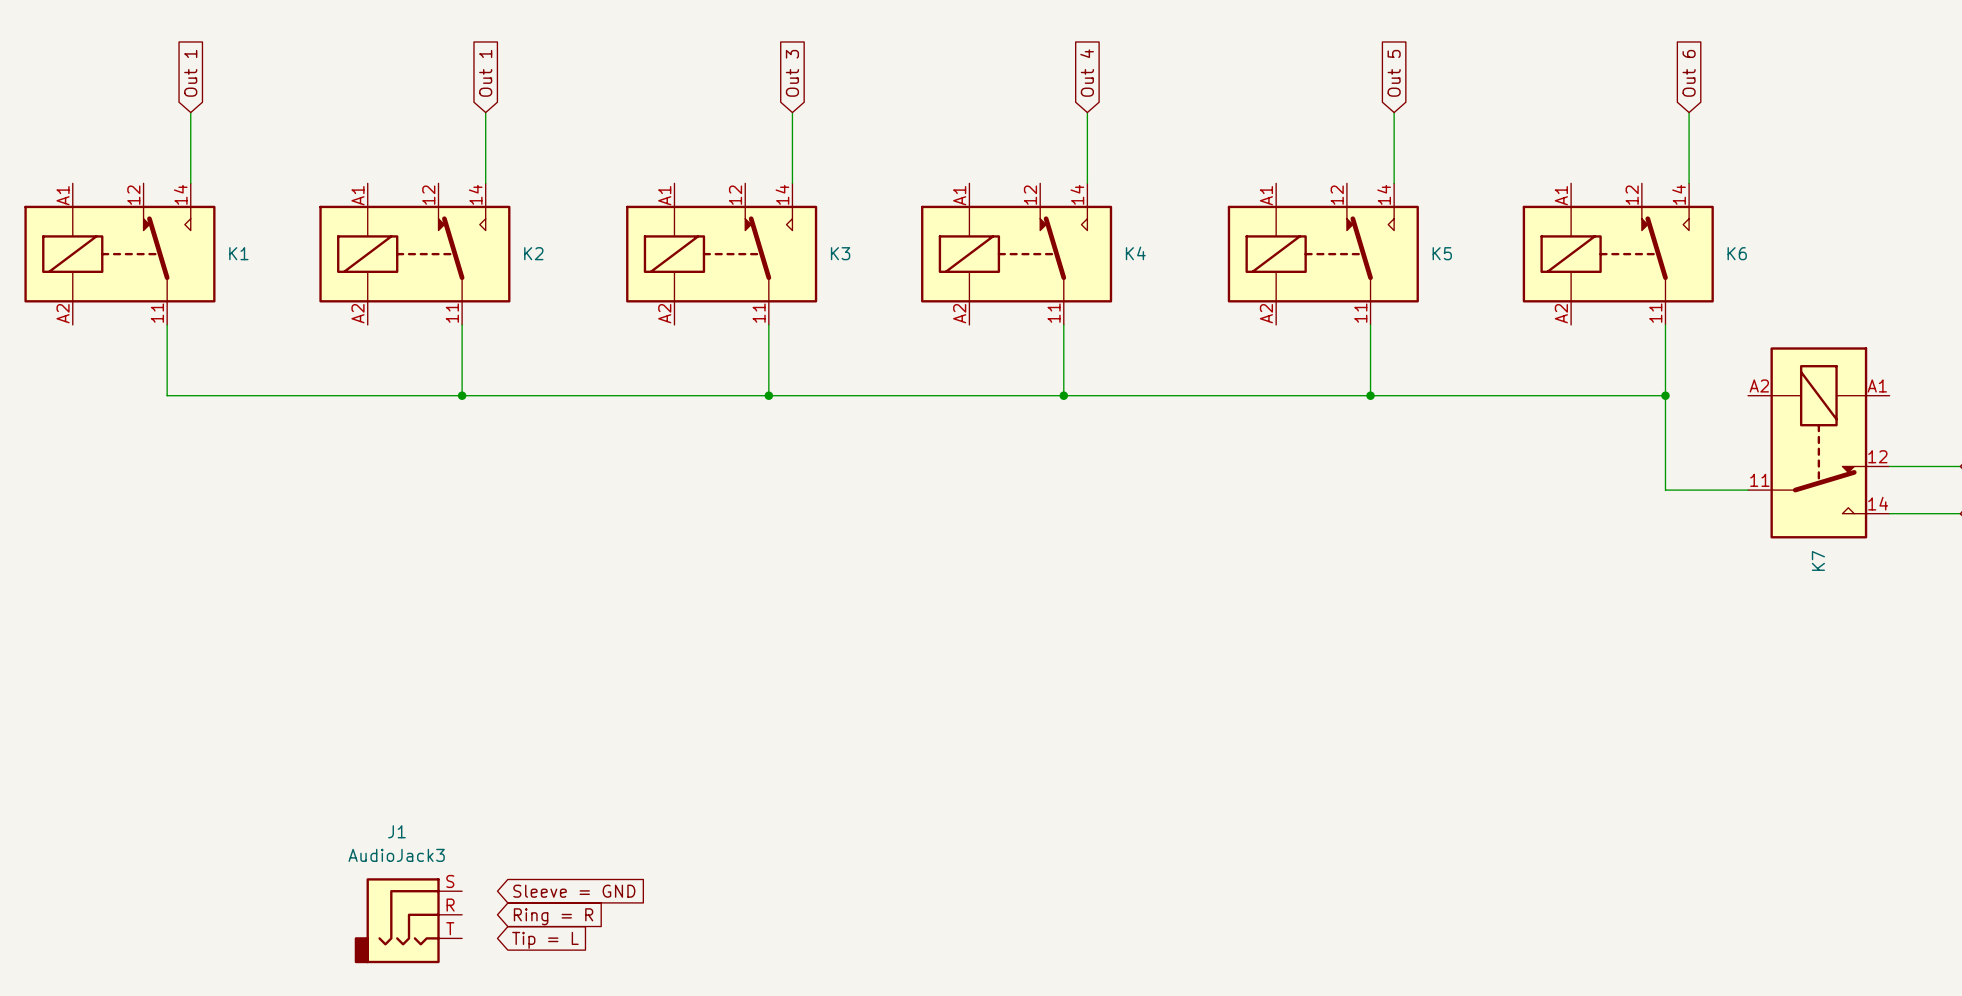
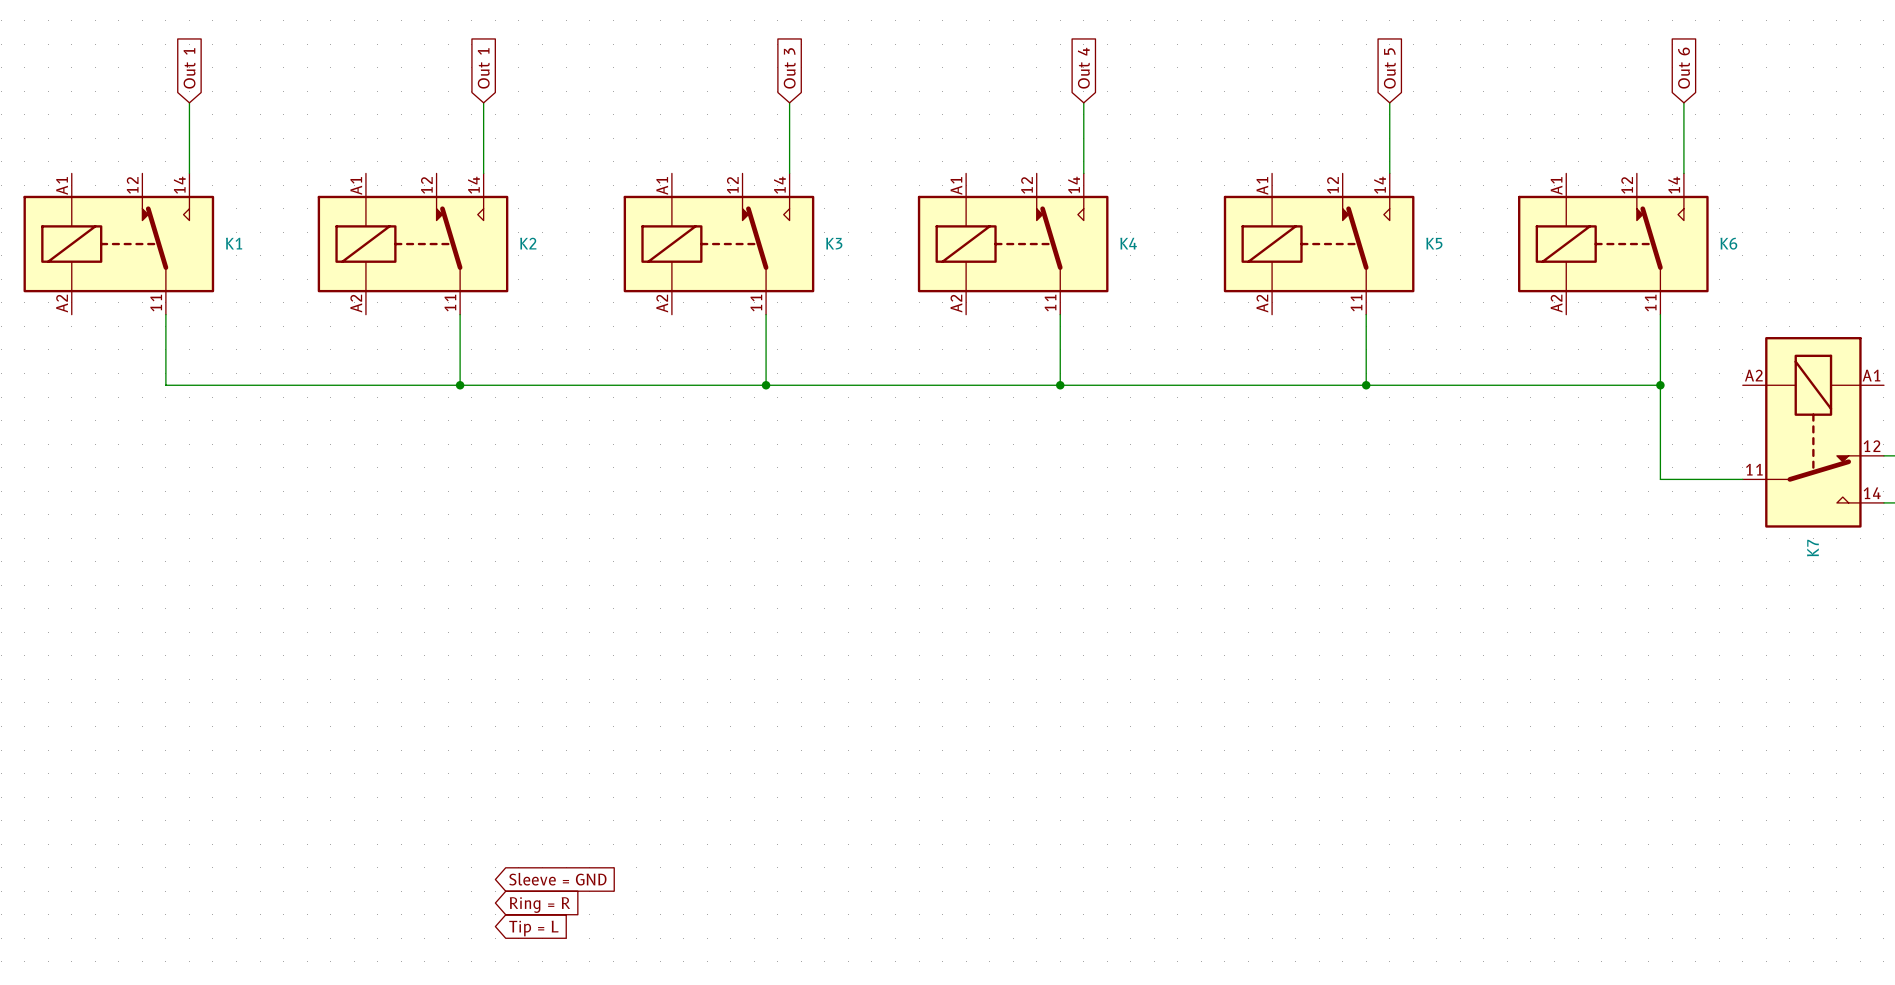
J1: AudioJack3 (408, 920) -> none

